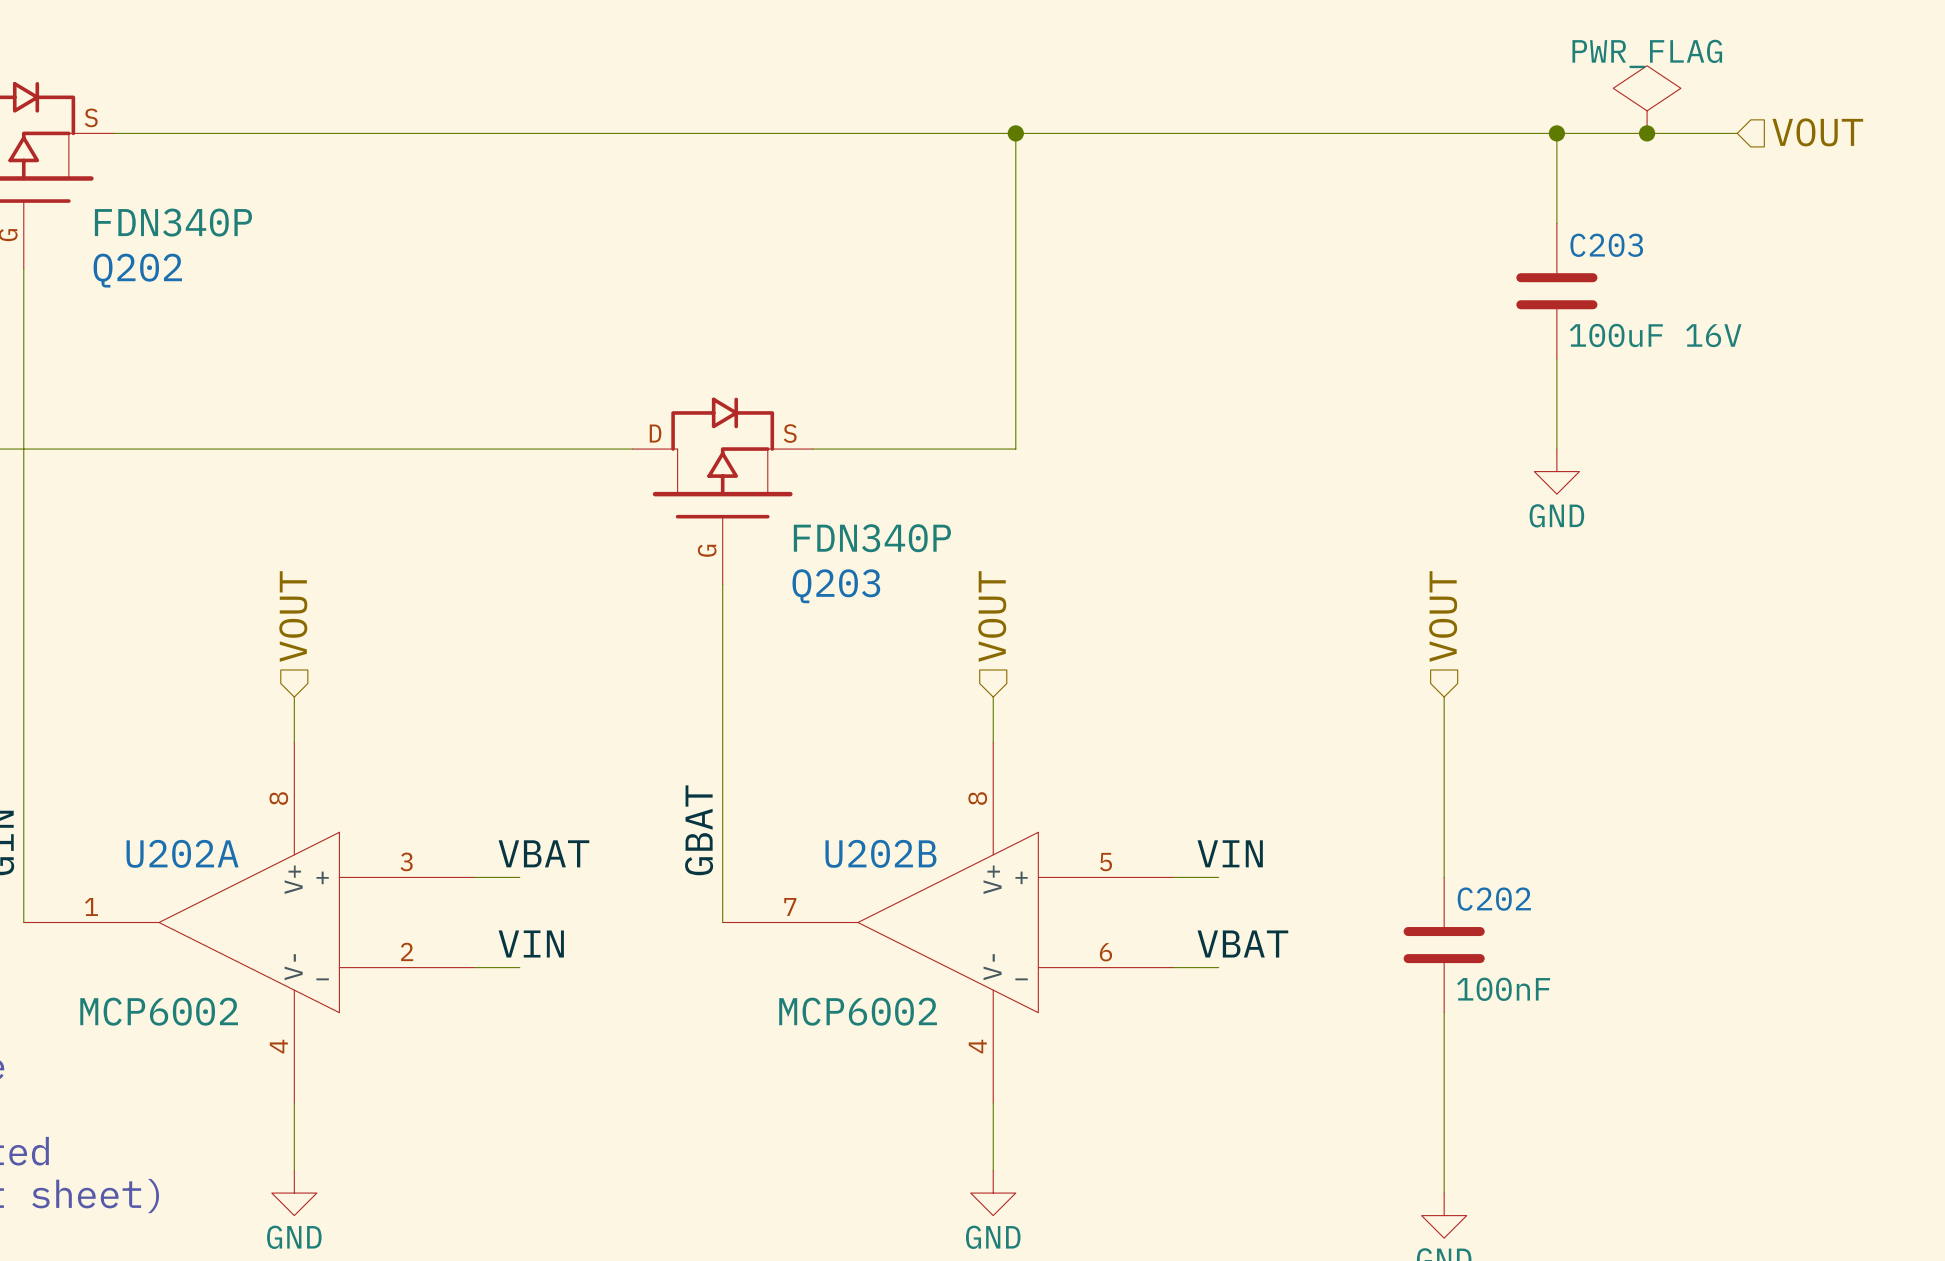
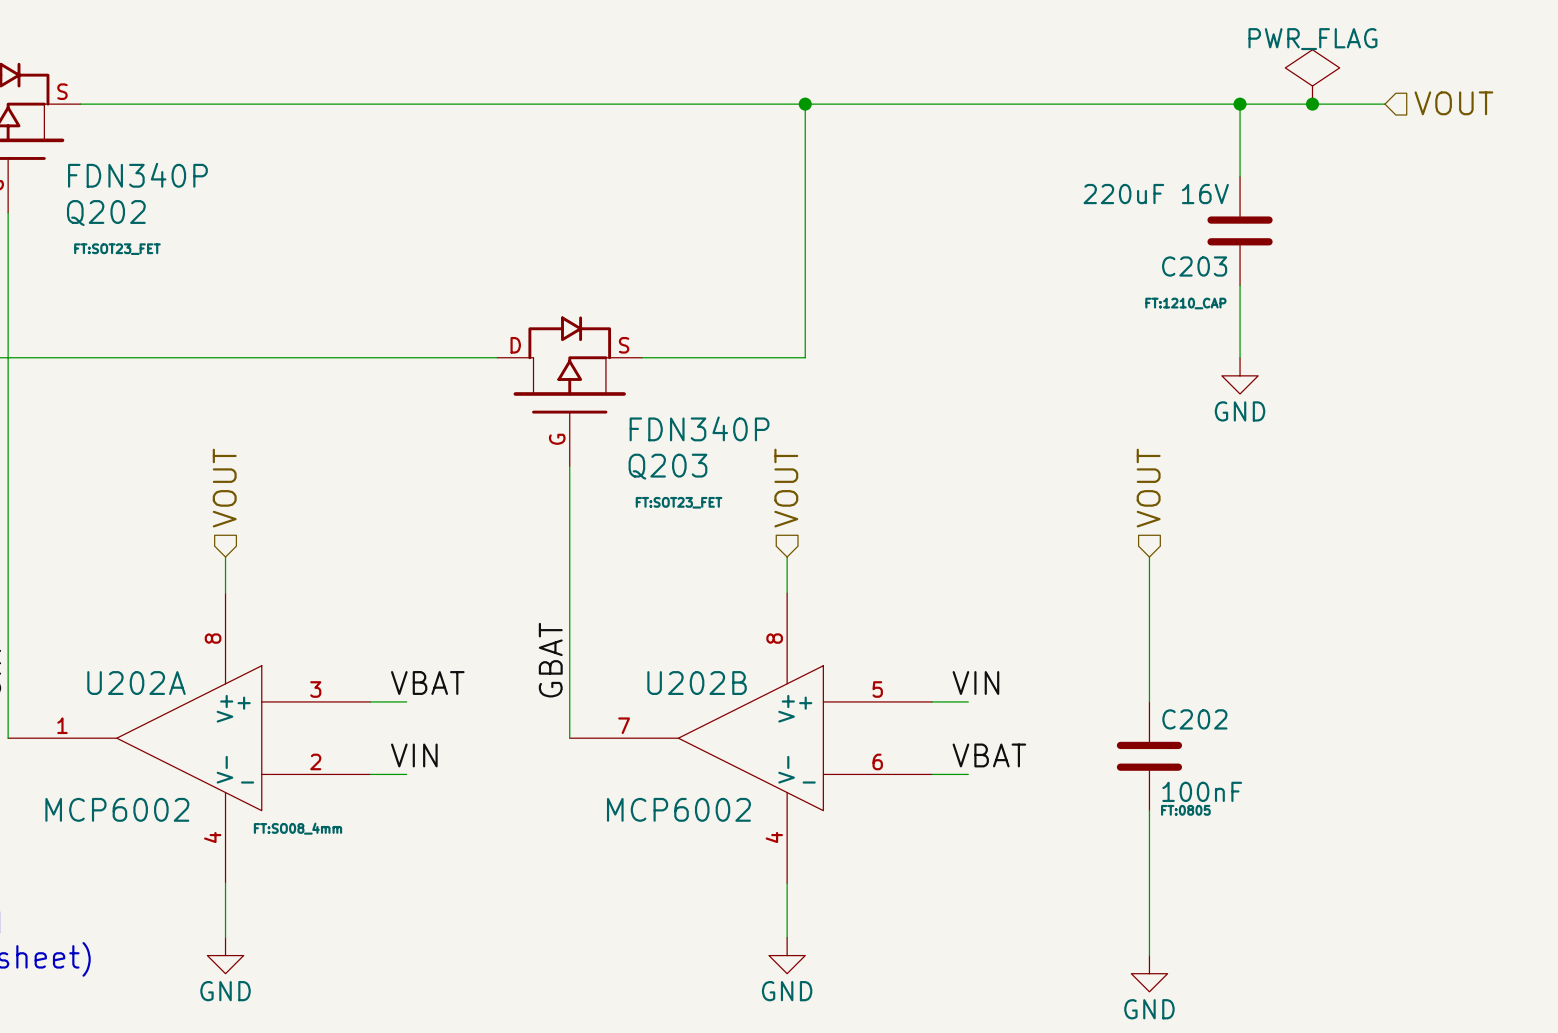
C203 name position: C203 (1606, 245) -> C203 (1194, 266)
Q202 text: none -> FT:SOT23_FET (117, 249)
C203 value: 100uF 16V (1655, 335) -> 220uF 16V (1156, 194)
C203 text: none -> FT:1210_CAP (1185, 303)
Q203 text: none -> FT:SOT23_FET (679, 502)
C202 text: none -> FT:0805 (1185, 810)
U202A text: none -> FT:SO08_4mm (297, 828)

